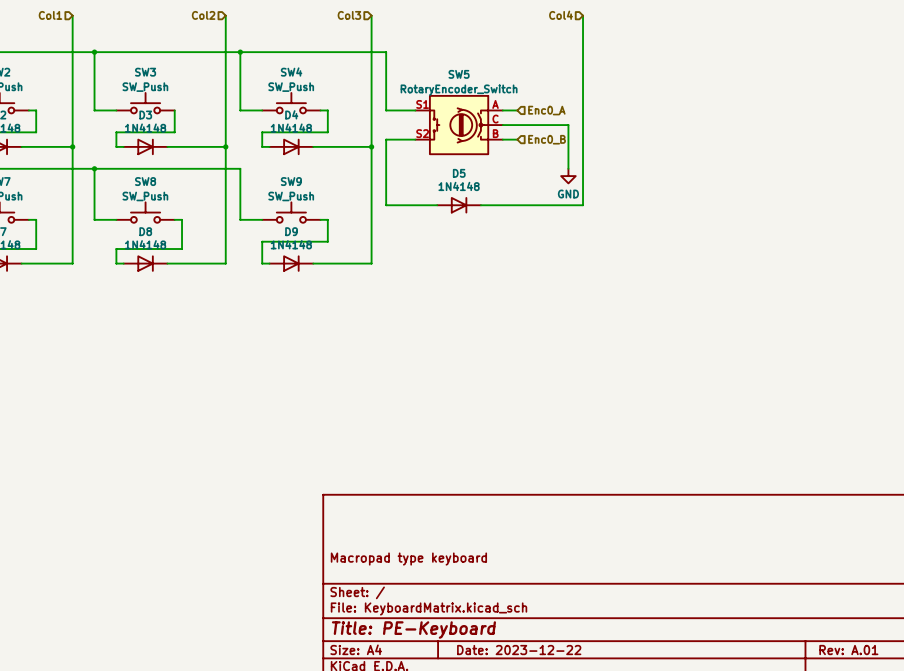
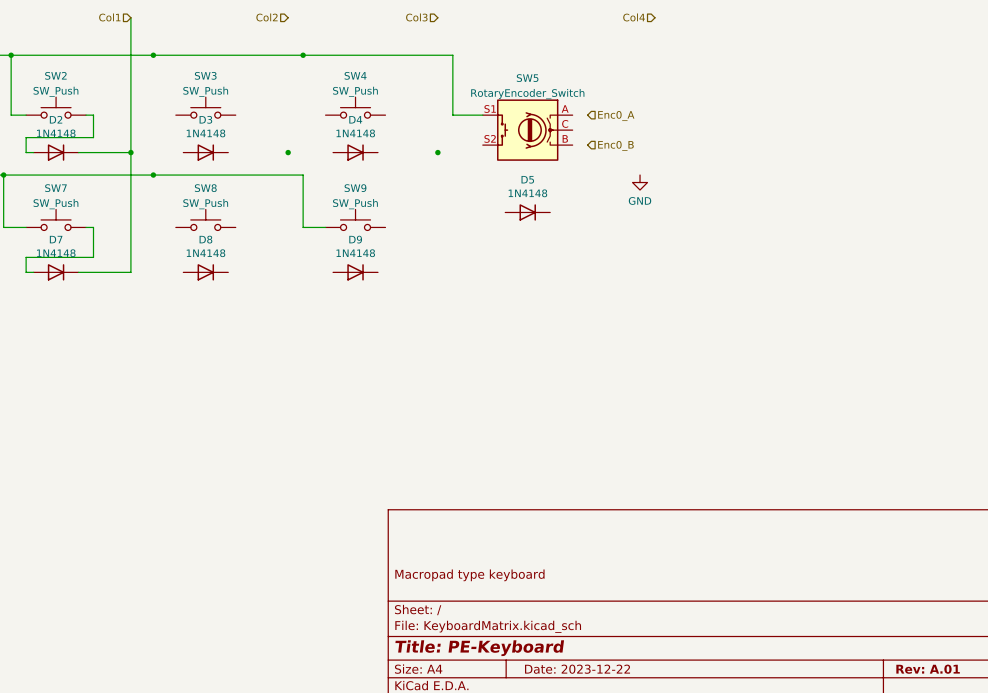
wire: (225, 15) (225, 263) (167, 263) -> none
wire: (371, 15) (371, 263) (313, 263) -> none
wire: (583, 15) (583, 205) (480, 205) -> none
wire: (94, 52) (94, 110) (116, 110) -> none
wire: (240, 52) (240, 110) (262, 110) -> none
wire: (174, 110) (174, 132) (116, 132) (116, 146) (123, 146) -> none
wire: (320, 110) (327, 110) (327, 132) (262, 132) (262, 146) (269, 146) -> none
wire: (502, 110) (517, 110) -> none
wire: (502, 125) (568, 125) (568, 168) -> none
wire: (415, 139) (386, 139) (386, 205) (437, 205) -> none
wire: (502, 139) (517, 139) -> none
wire: (167, 146) (225, 146) -> none
wire: (313, 146) (371, 146) -> none
wire: (94, 168) (94, 219) (116, 219) -> none
wire: (174, 219) (182, 219) (182, 249) (116, 249) (116, 263) (123, 263) -> none
wire: (320, 219) (327, 219) (327, 241) (262, 241) (262, 263) (269, 263) -> none

